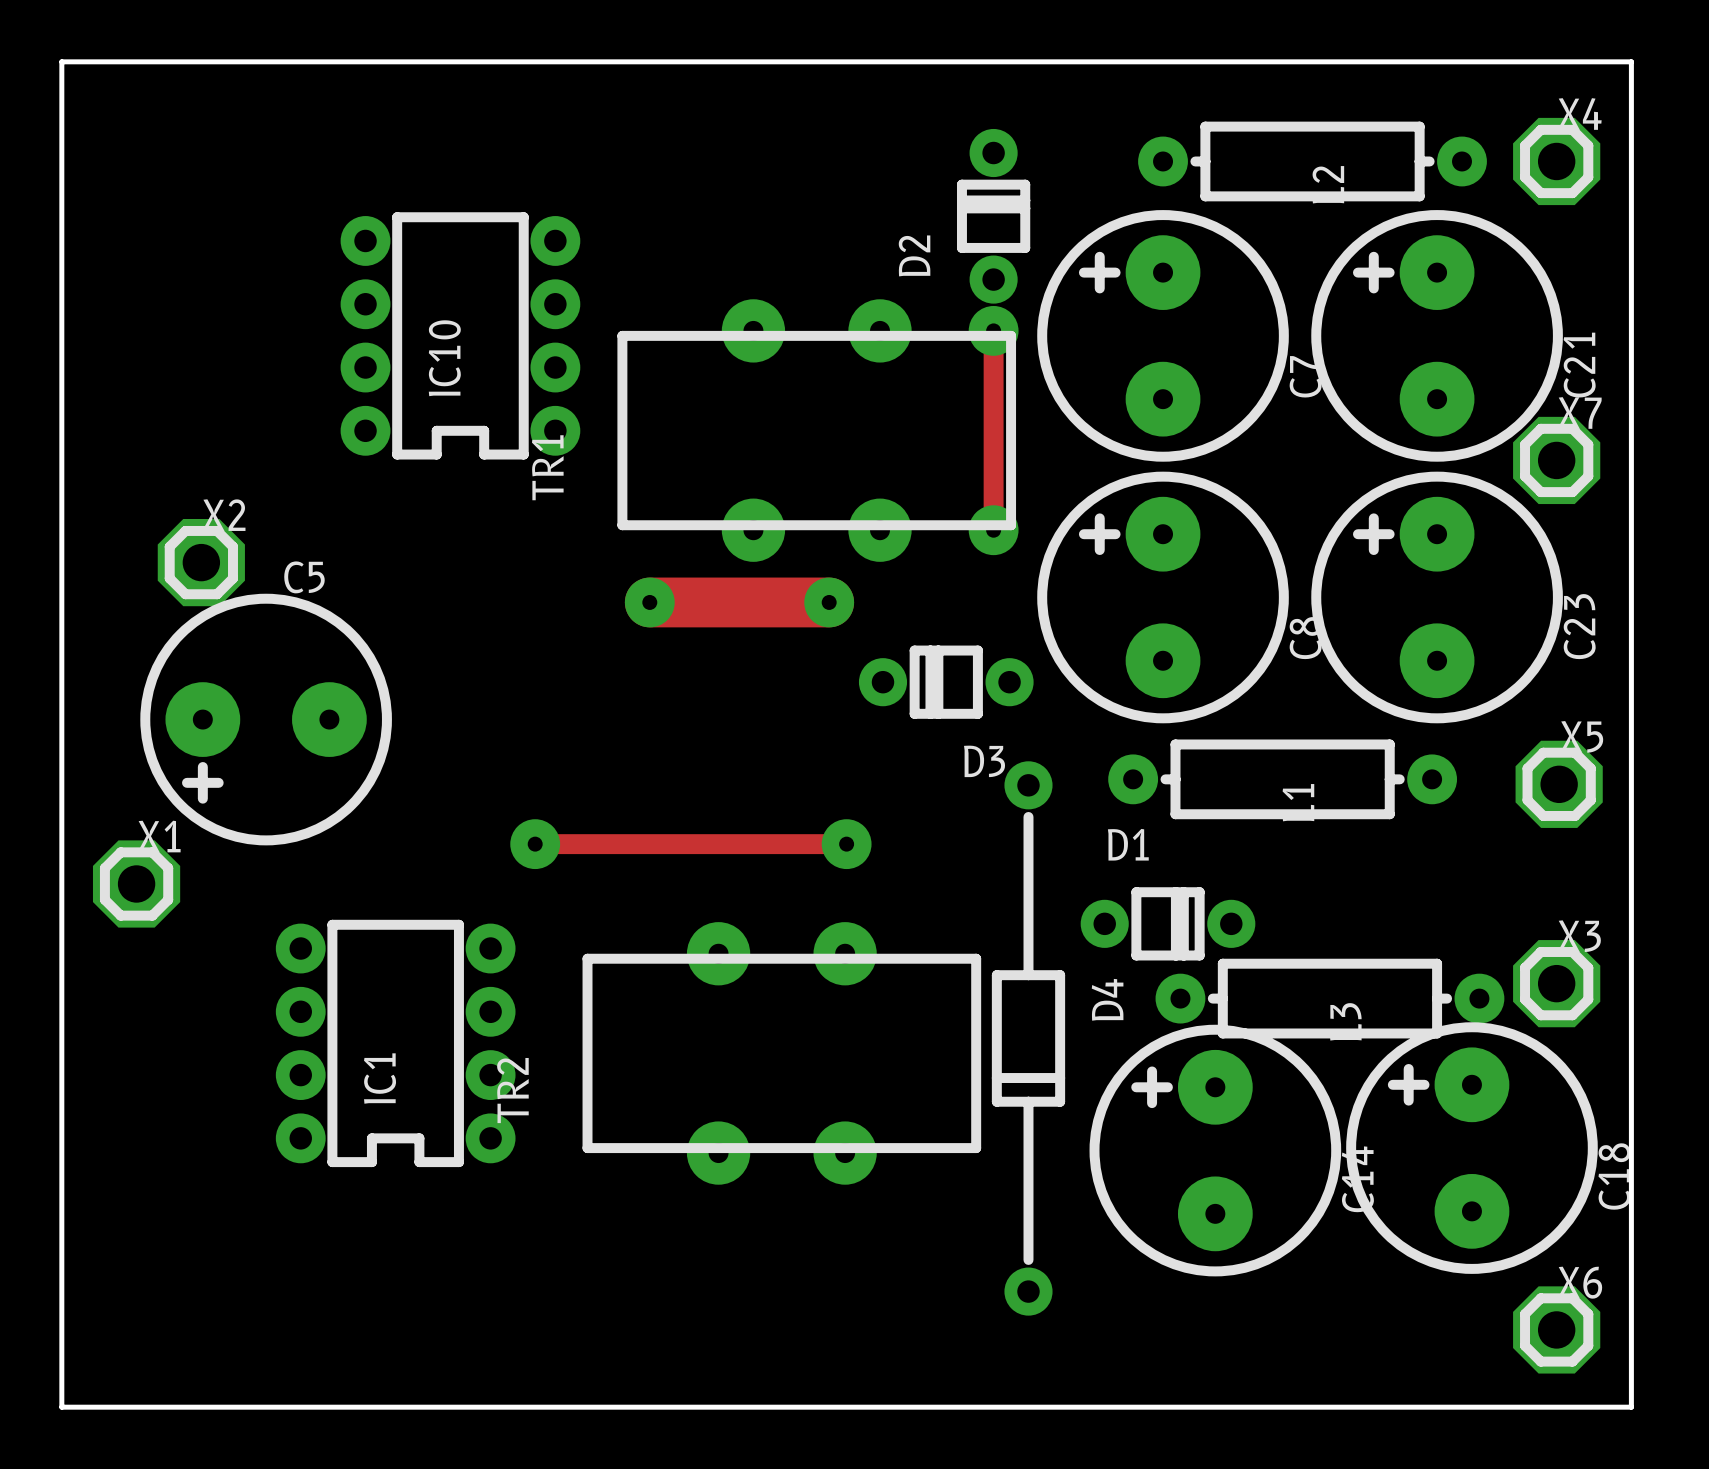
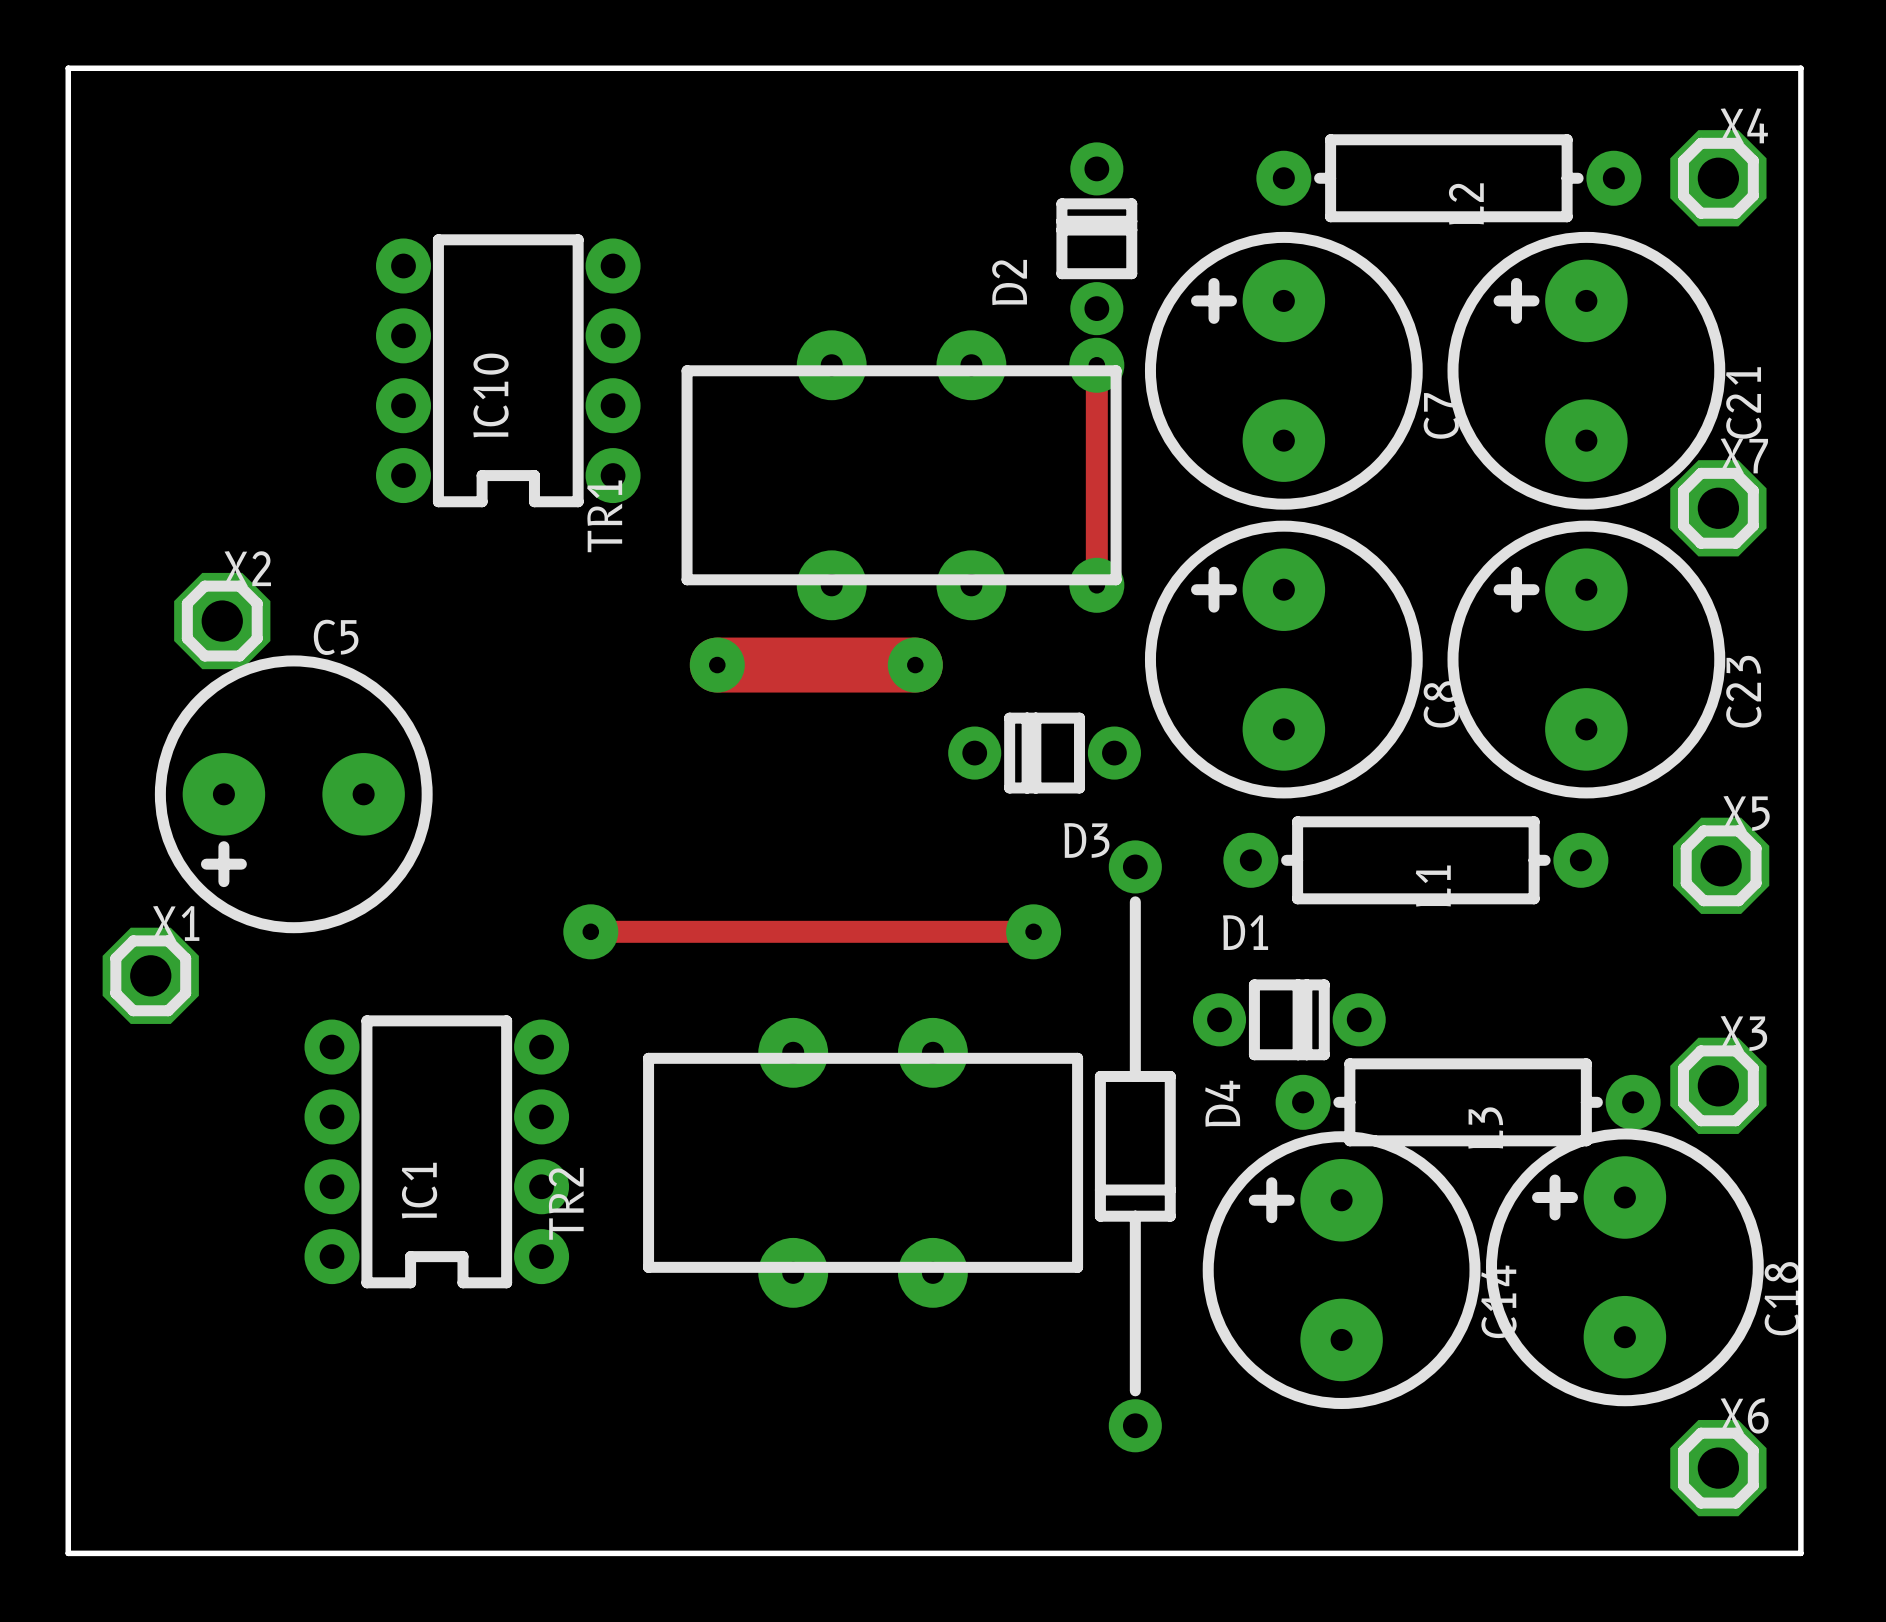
track: none -> (934, 931) (1033, 931)
via position: (846, 844) -> (1033, 931)

